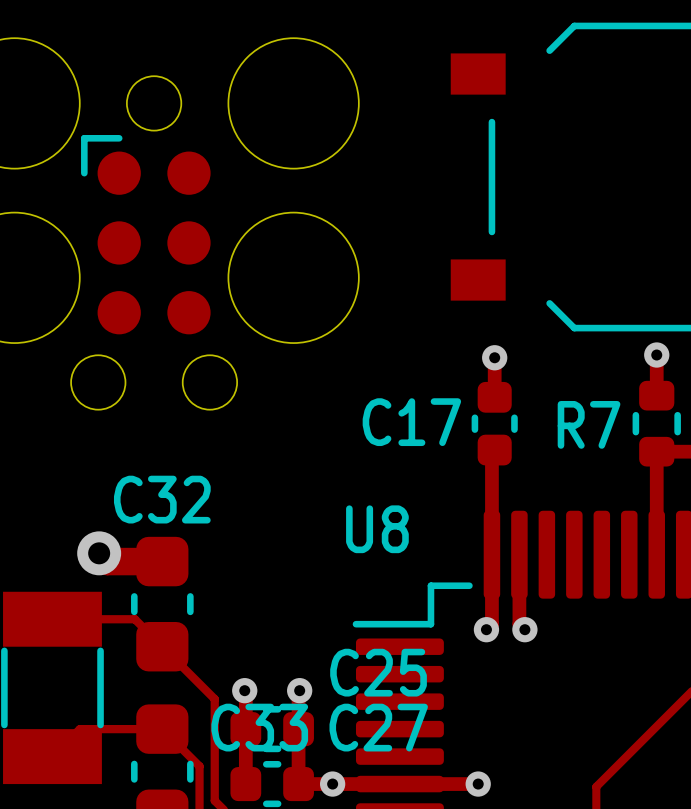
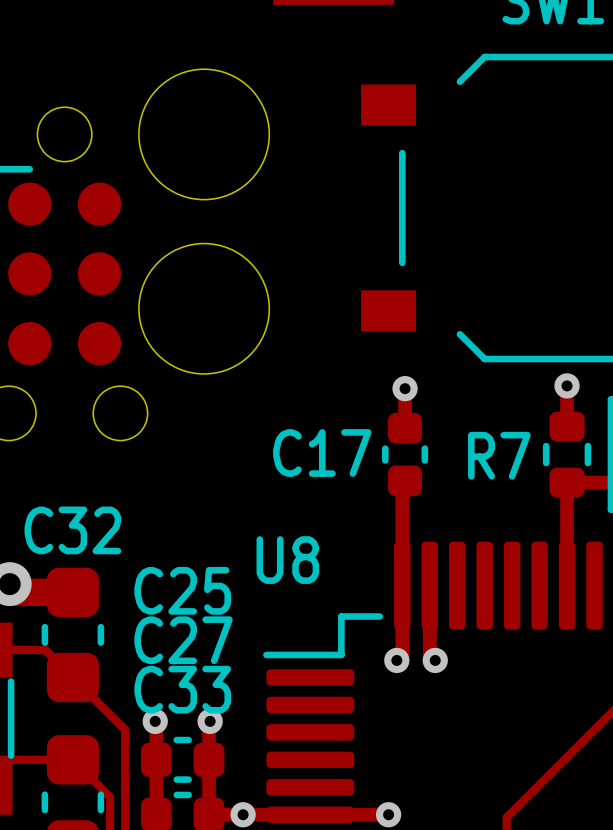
C25 name position: C25 (378, 672) -> C25 (182, 590)
C33 name position: C33 (259, 727) -> C33 (182, 689)
C27 name position: C27 (378, 727) -> C27 (183, 640)

